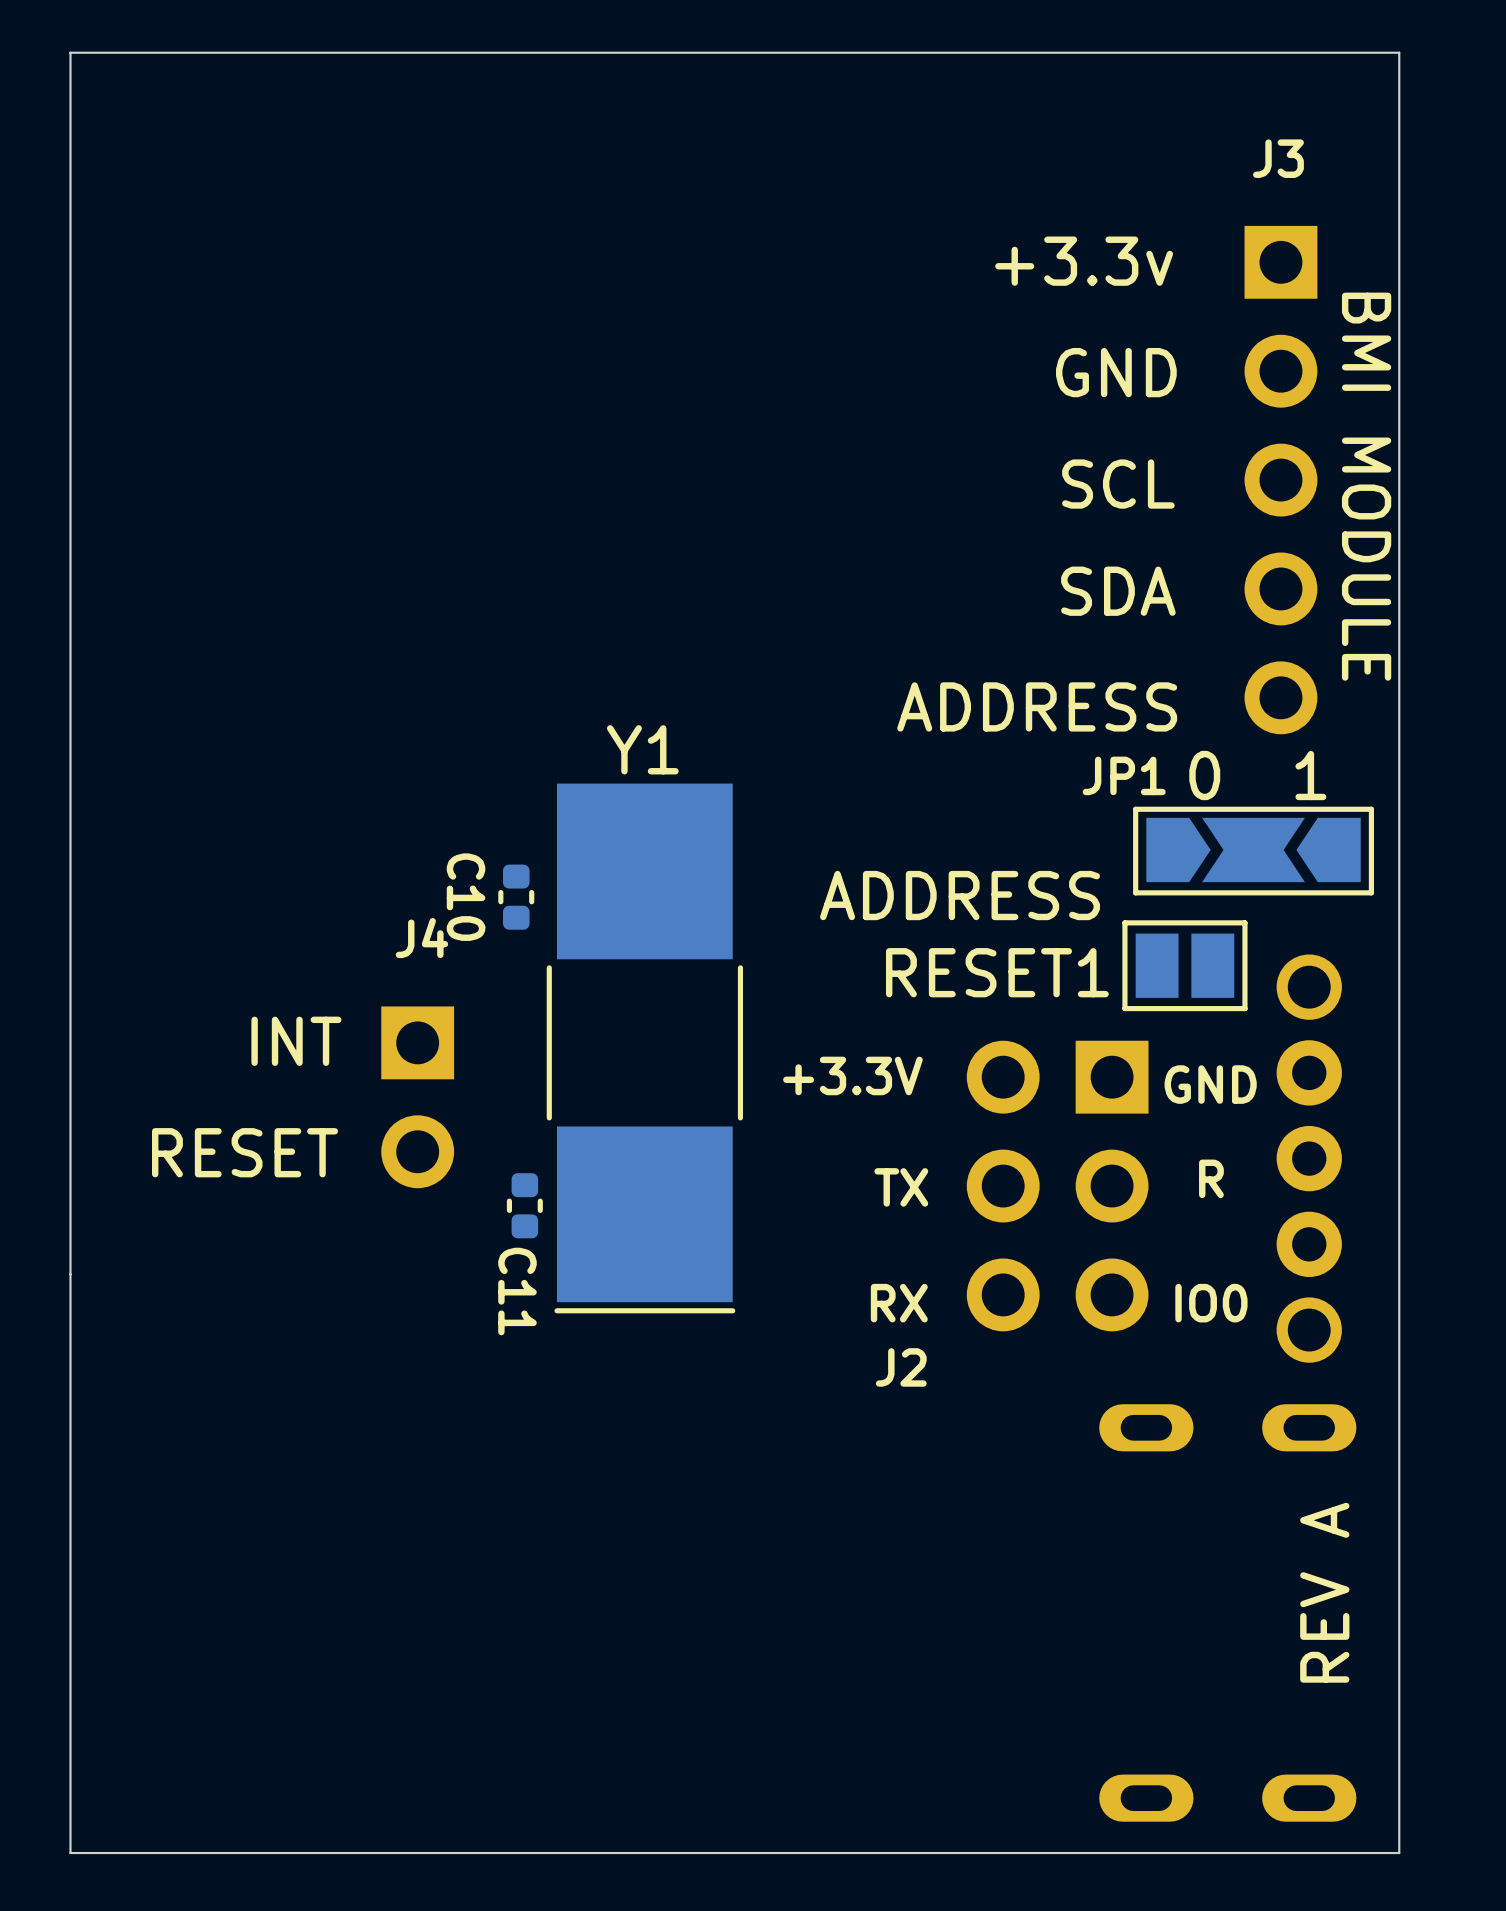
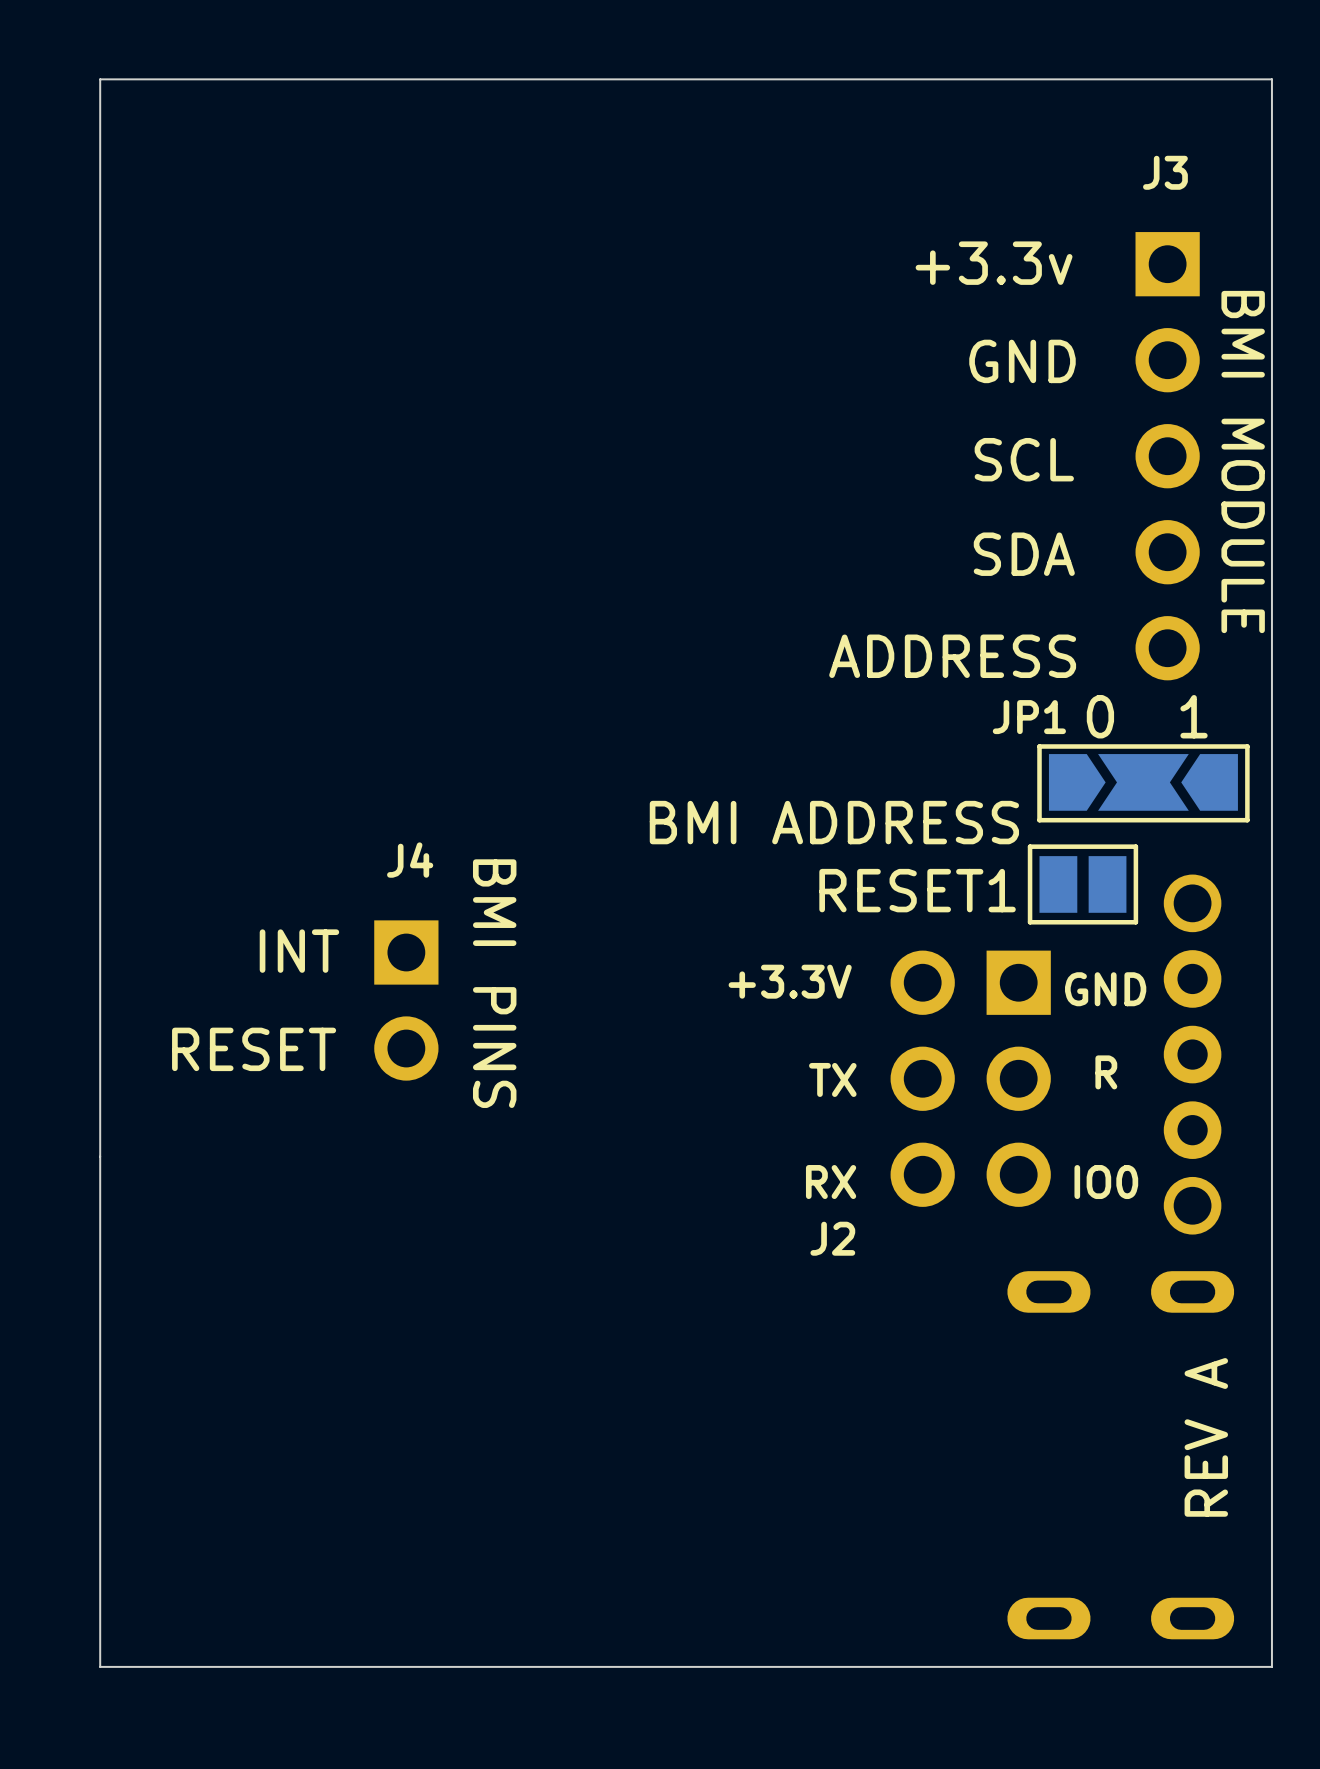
text: ADDRESS (960, 895) -> BMI ADDRESS (834, 822)
C10: (516, 897) -> none
Y1: (644, 1048) -> none
text: none -> BMI PINS (494, 983)
C11: (524, 1205) -> none

